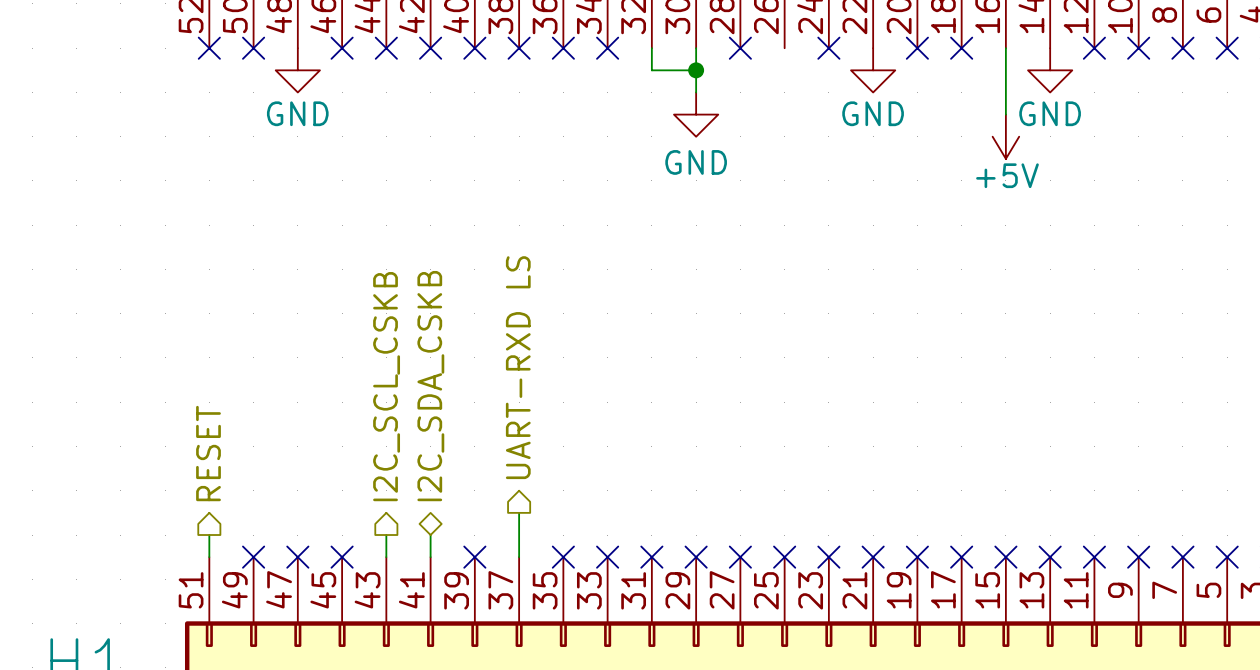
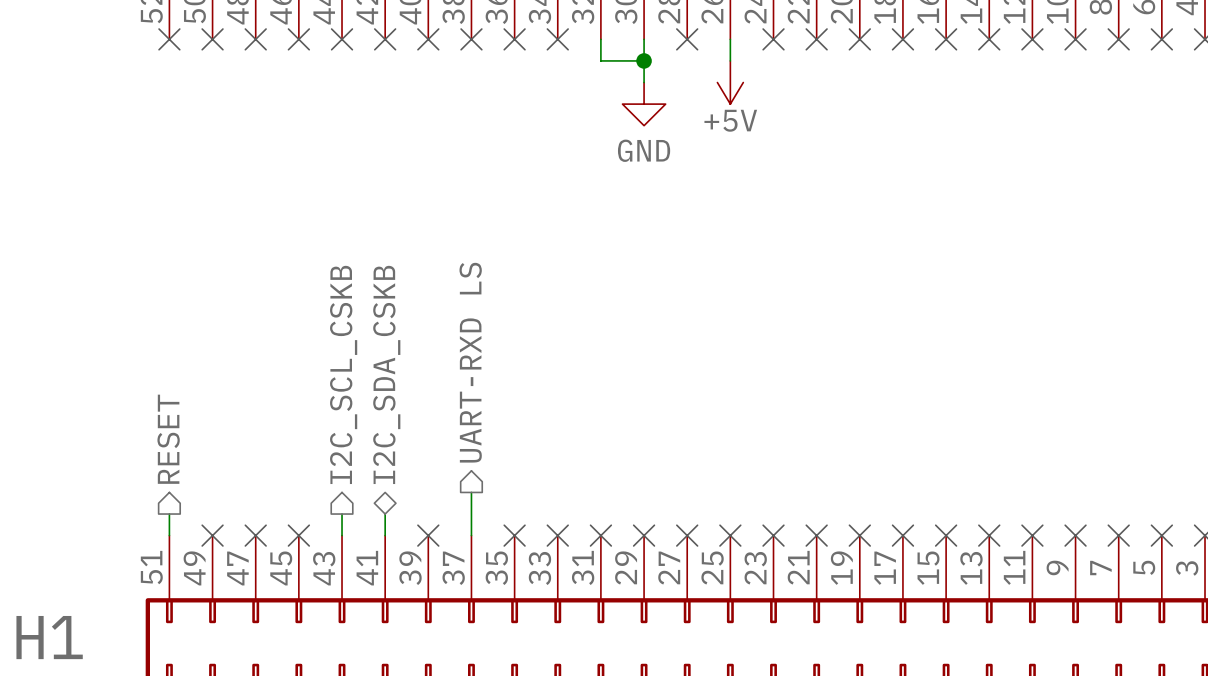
no-connect mark: none -> (255, 39)
wire: none -> (730, 39) (730, 60)
no-connect mark: none -> (816, 39)
wire: (1005, 48) (1005, 114) -> none
no-connect mark: none -> (946, 39)
no-connect mark: none -> (989, 39)
power symbol: GND (297, 70) -> none
power symbol: GND (873, 70) -> none
power symbol: GND (1050, 70) -> none
power symbol position: +5V (1005, 136) -> +5V (730, 82)

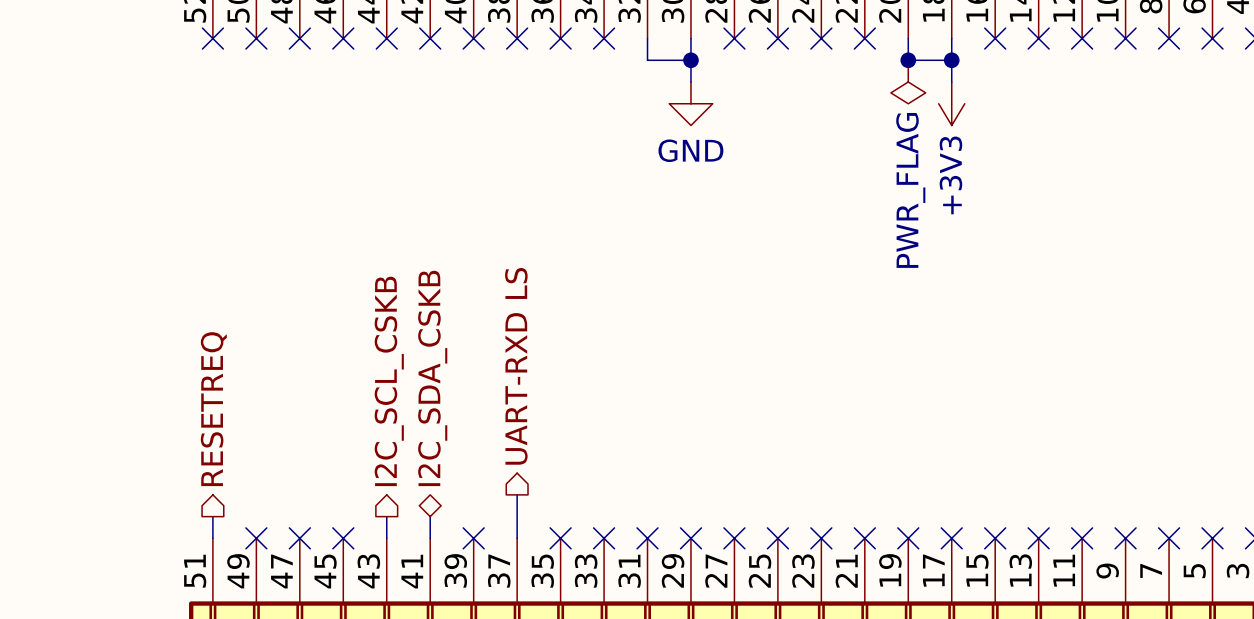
wire: (730, 39) (730, 60) -> none
no-connect mark: none -> (777, 38)
wire: none -> (908, 38) (908, 60) (951, 60)
no-connect mark: (859, 39) -> none
wire: none -> (951, 38) (951, 82)
no-connect mark: (902, 39) -> none
junction: none -> (908, 60)
junction: none -> (951, 60)
power symbol: +5V (730, 82) -> none
power symbol: none -> PWR_FLAG (908, 82)
power symbol: none -> +3V3 (951, 103)
hierarchical label: RESET (168, 439) -> RESETREQ (213, 409)

